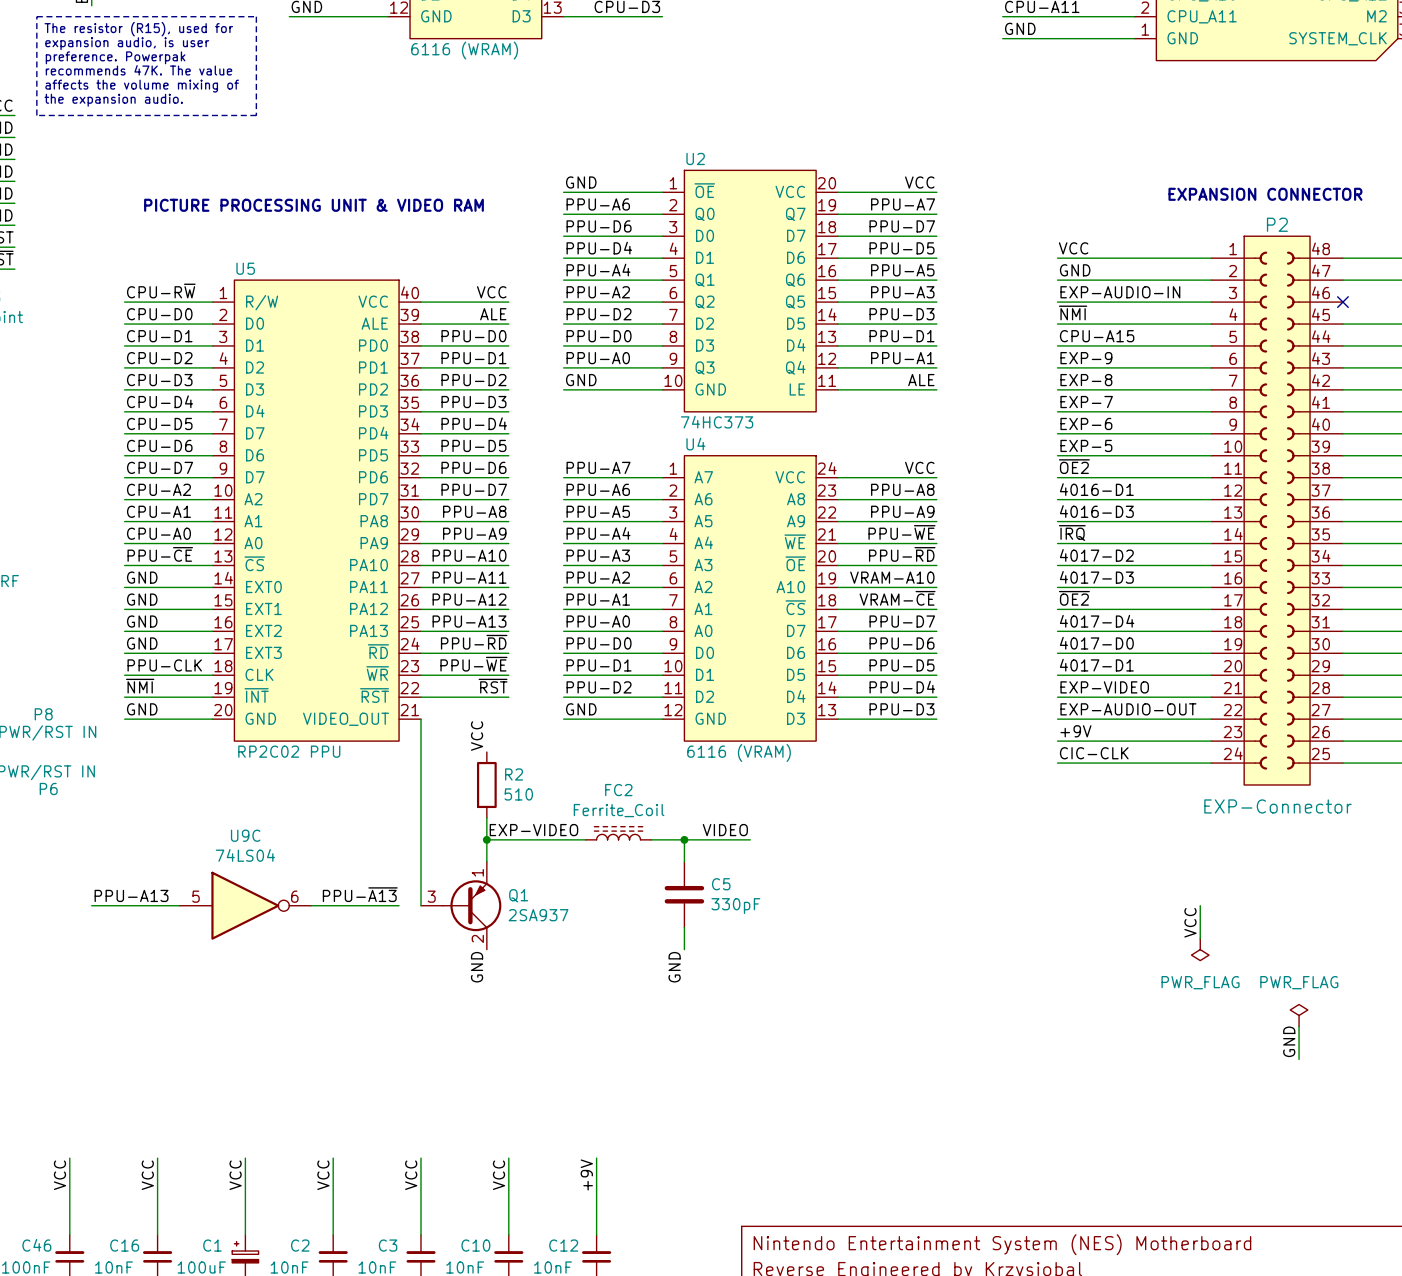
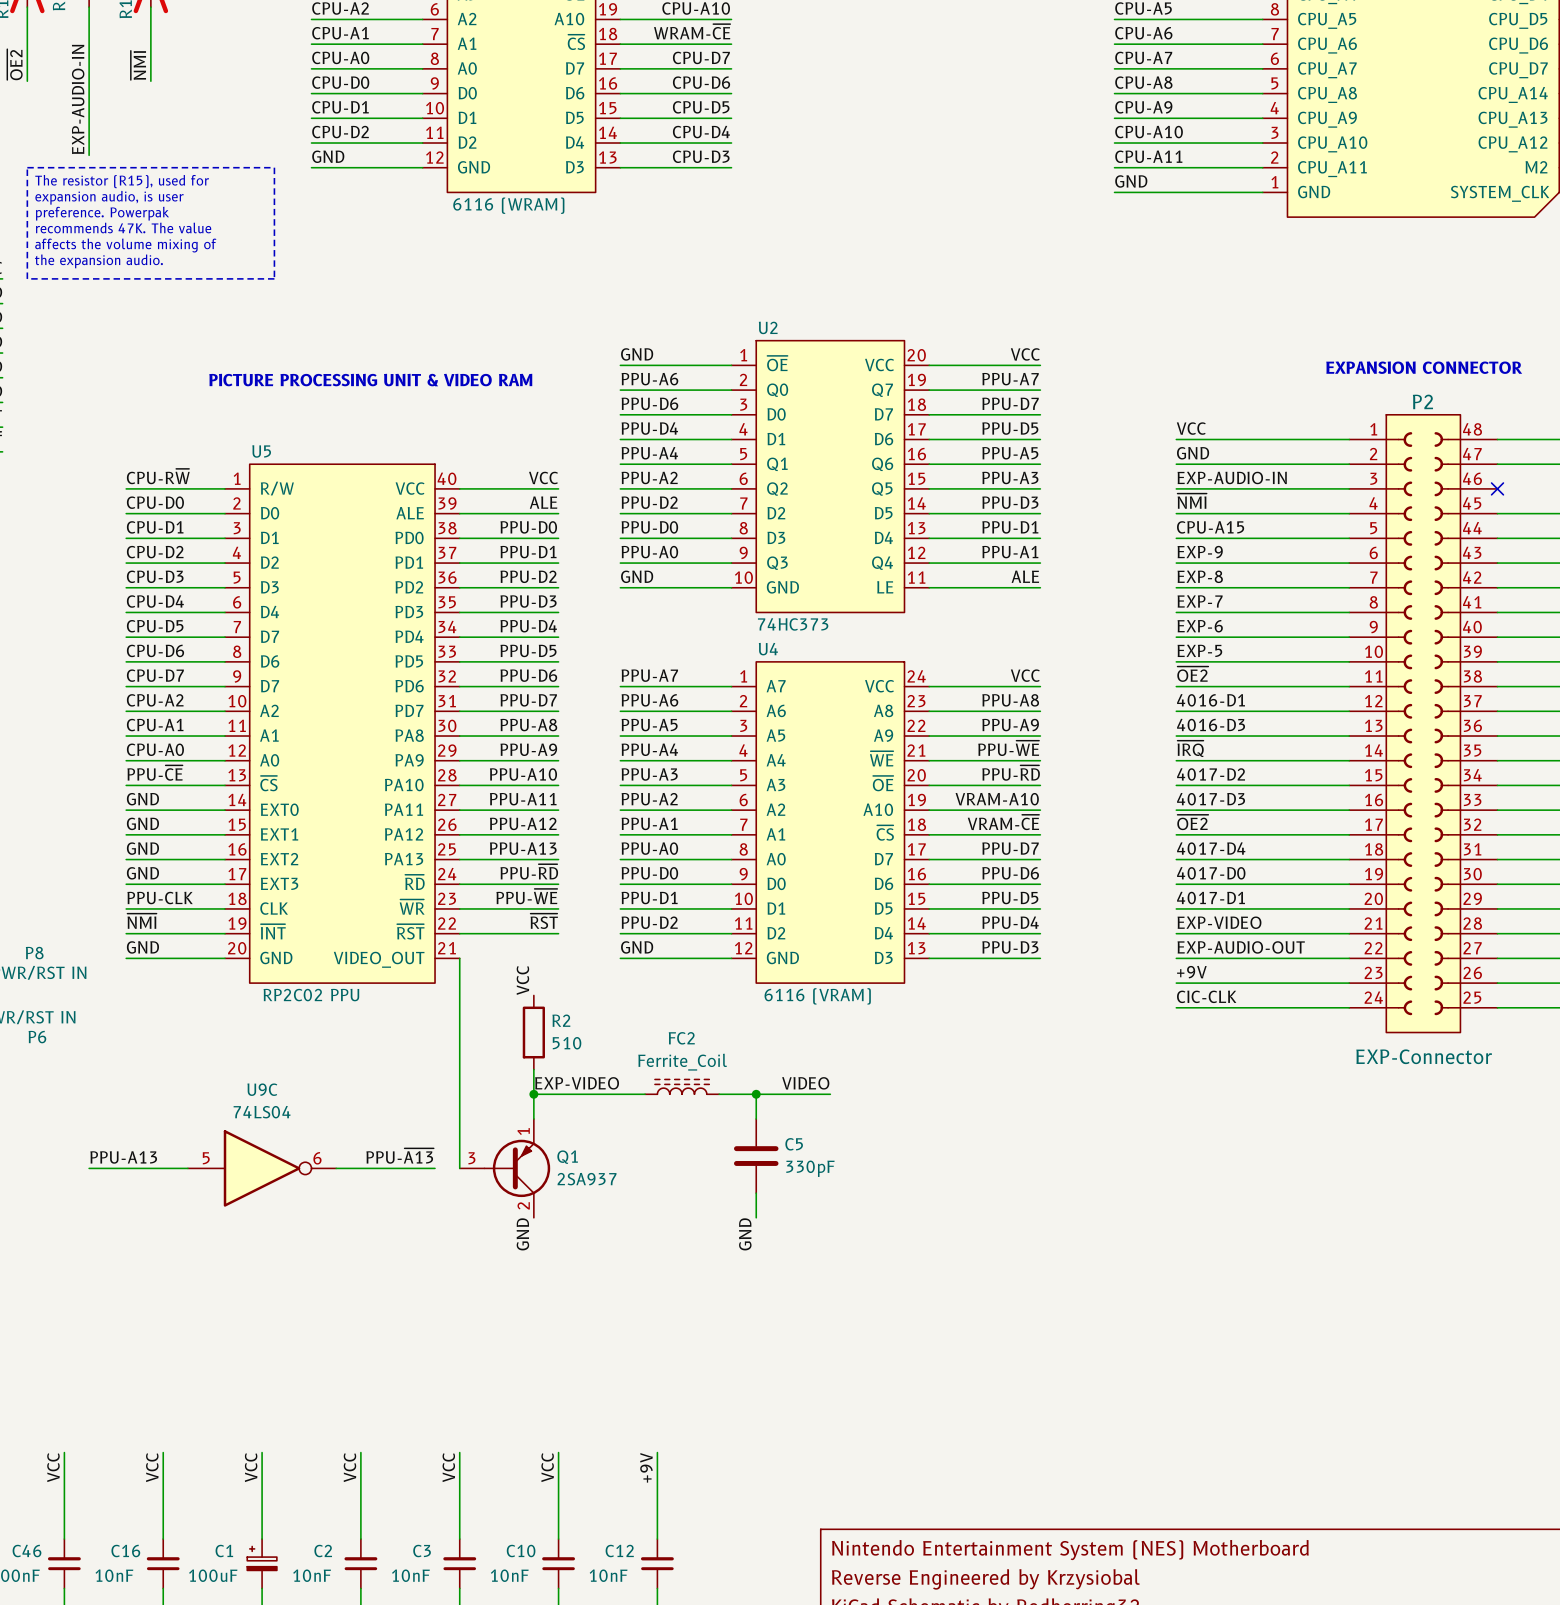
wire: (1200, 905) (1200, 938) -> none
label: VCC (1190, 922) -> none
power symbol: PWR_FLAG (1200, 949) -> none
power symbol: PWR_FLAG (1299, 1015) -> none
wire: (1299, 1026) (1299, 1059) -> none
label: GND (1289, 1041) -> none

